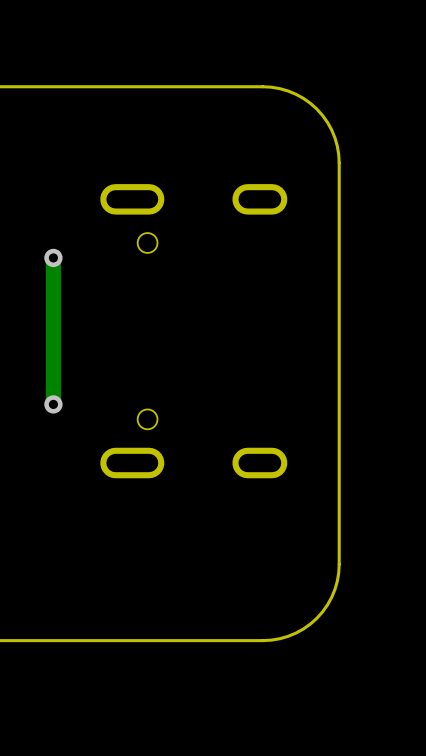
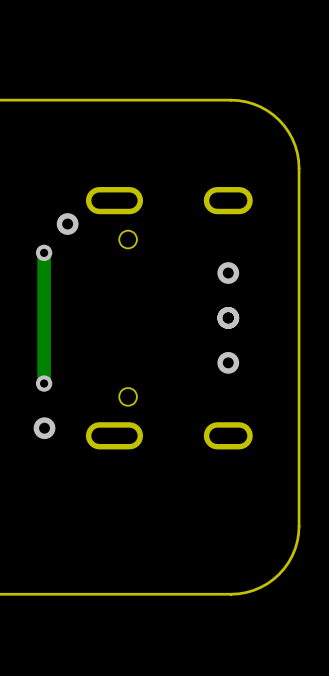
via: none -> (67, 224)
via: none -> (228, 273)
via: none -> (228, 317)
via: none -> (228, 362)
via: none -> (44, 428)

